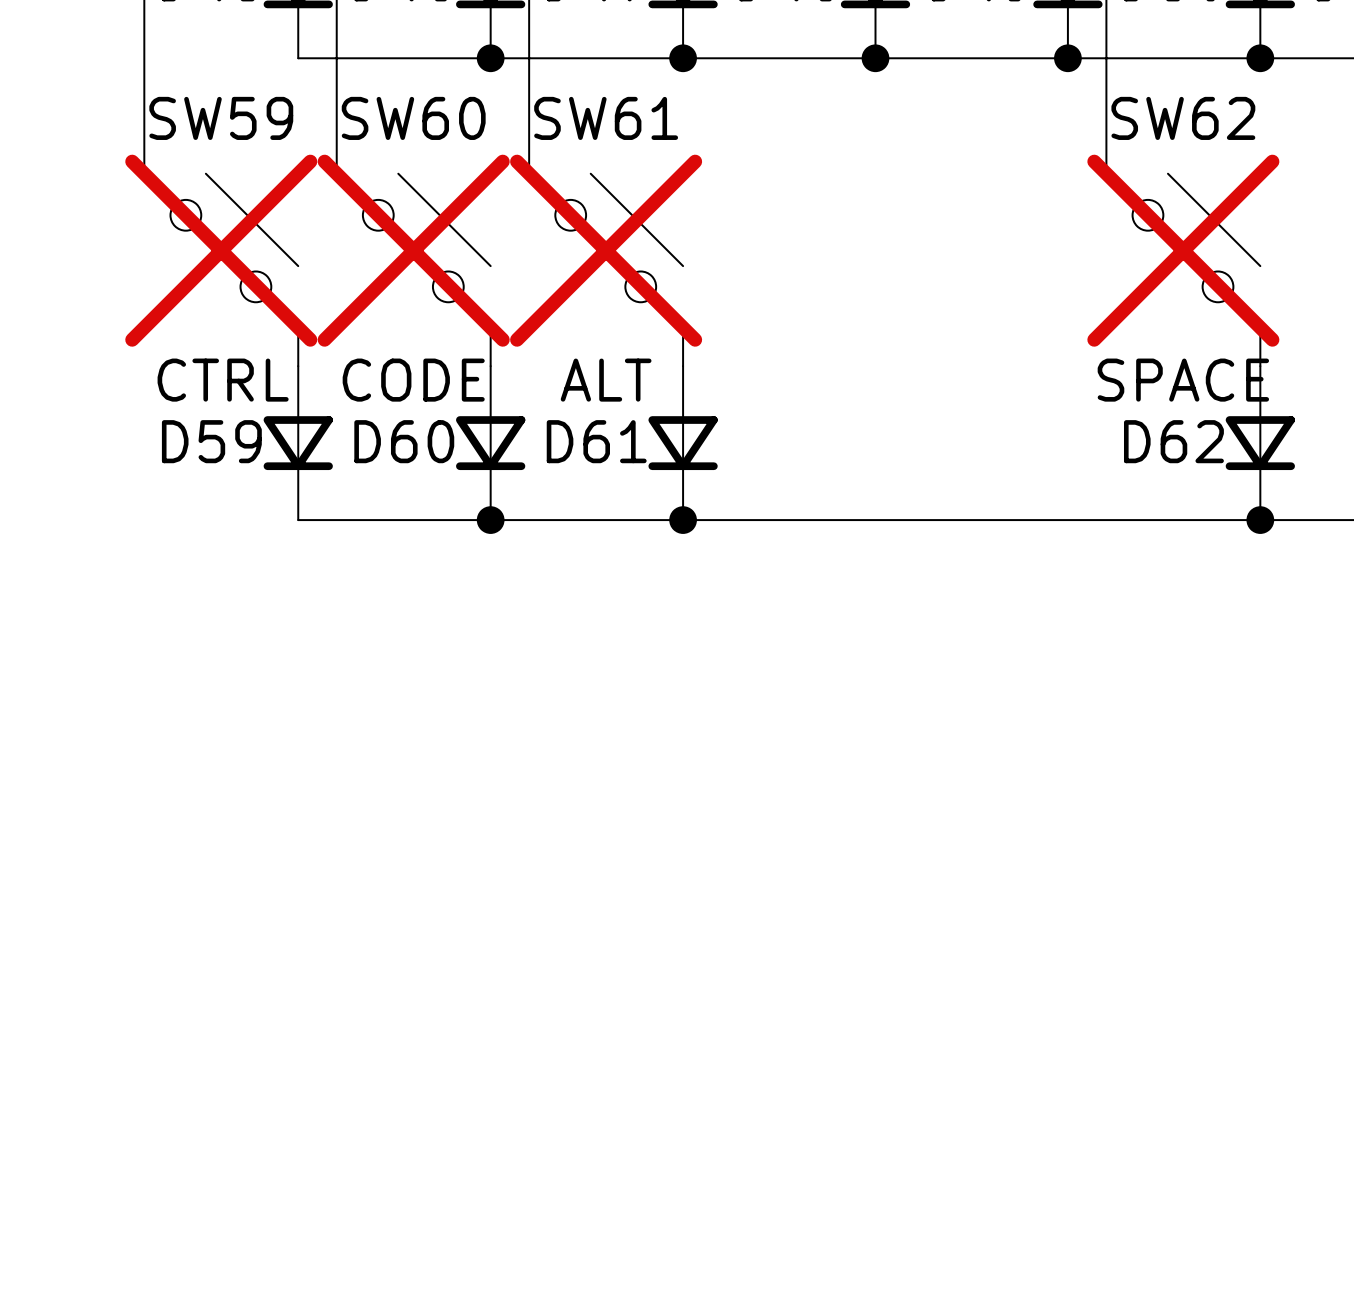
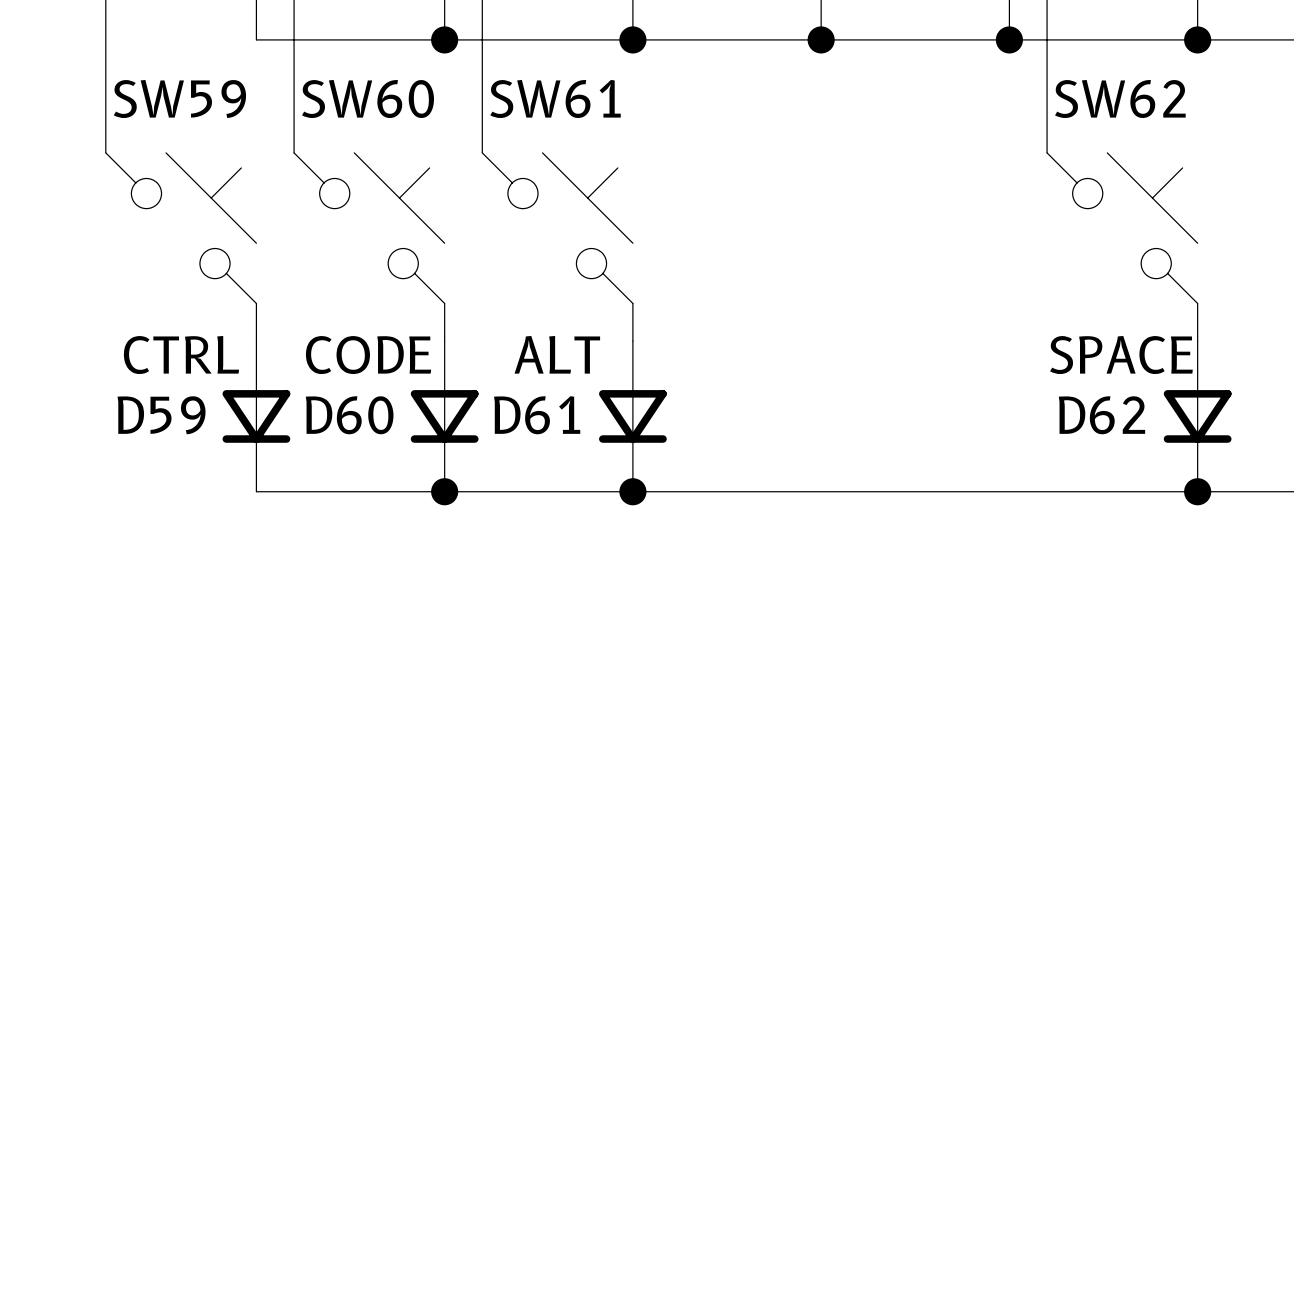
SW59 do-not-place cross: (221, 250) -> none
SW60 do-not-place cross: (413, 250) -> none
SW61 do-not-place cross: (606, 250) -> none
SW62 do-not-place cross: (1183, 250) -> none

